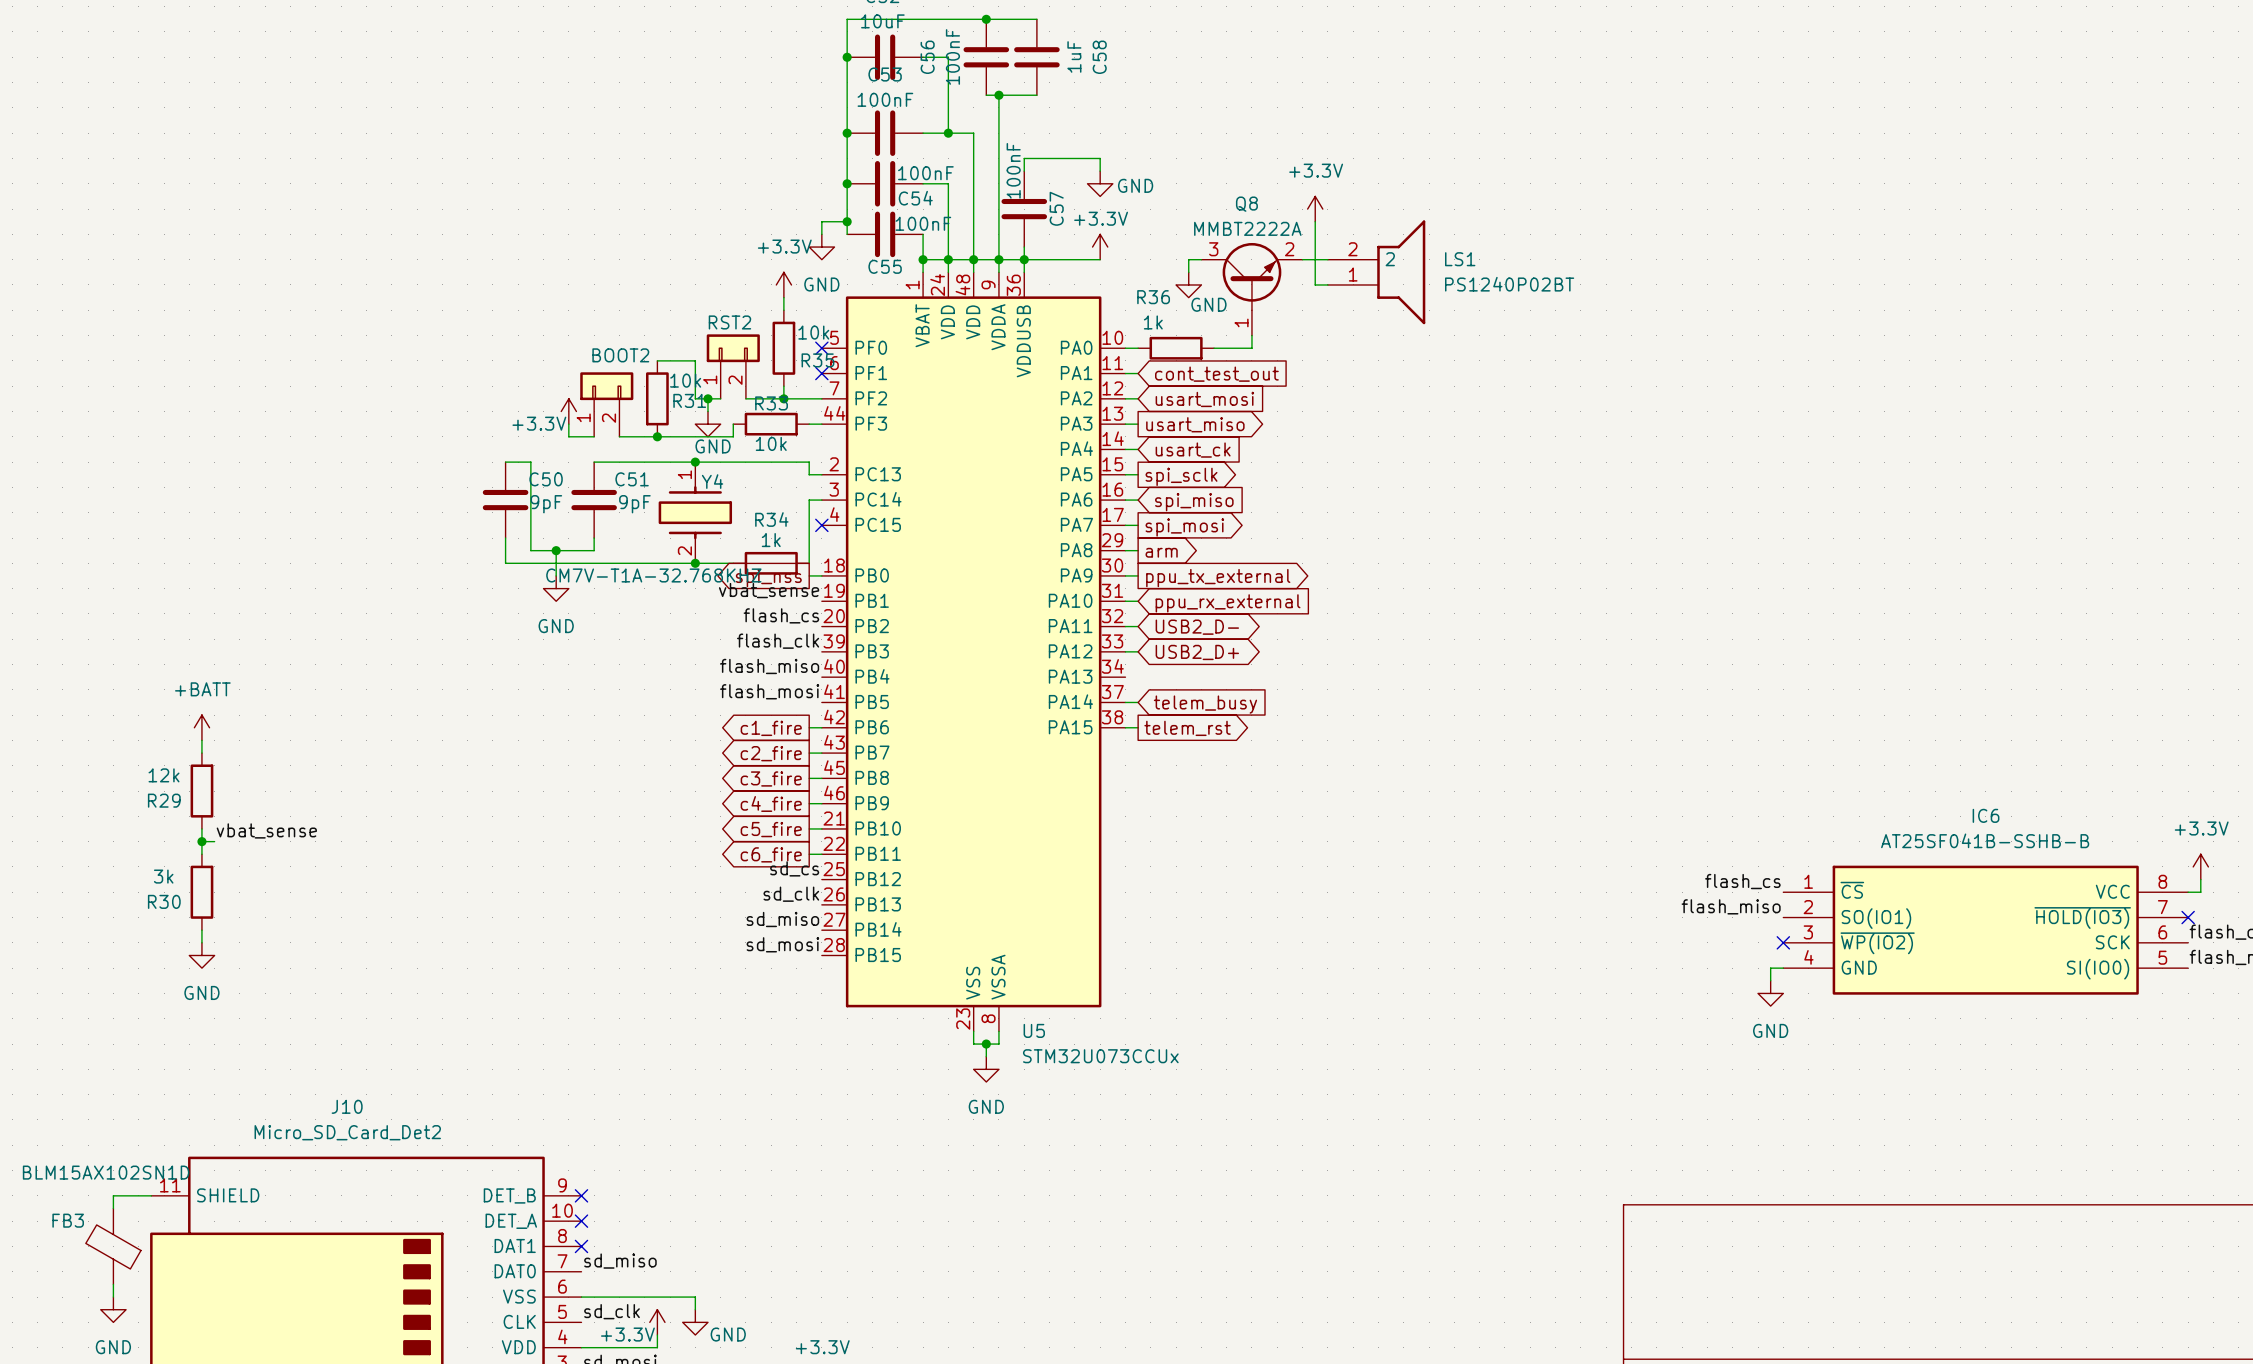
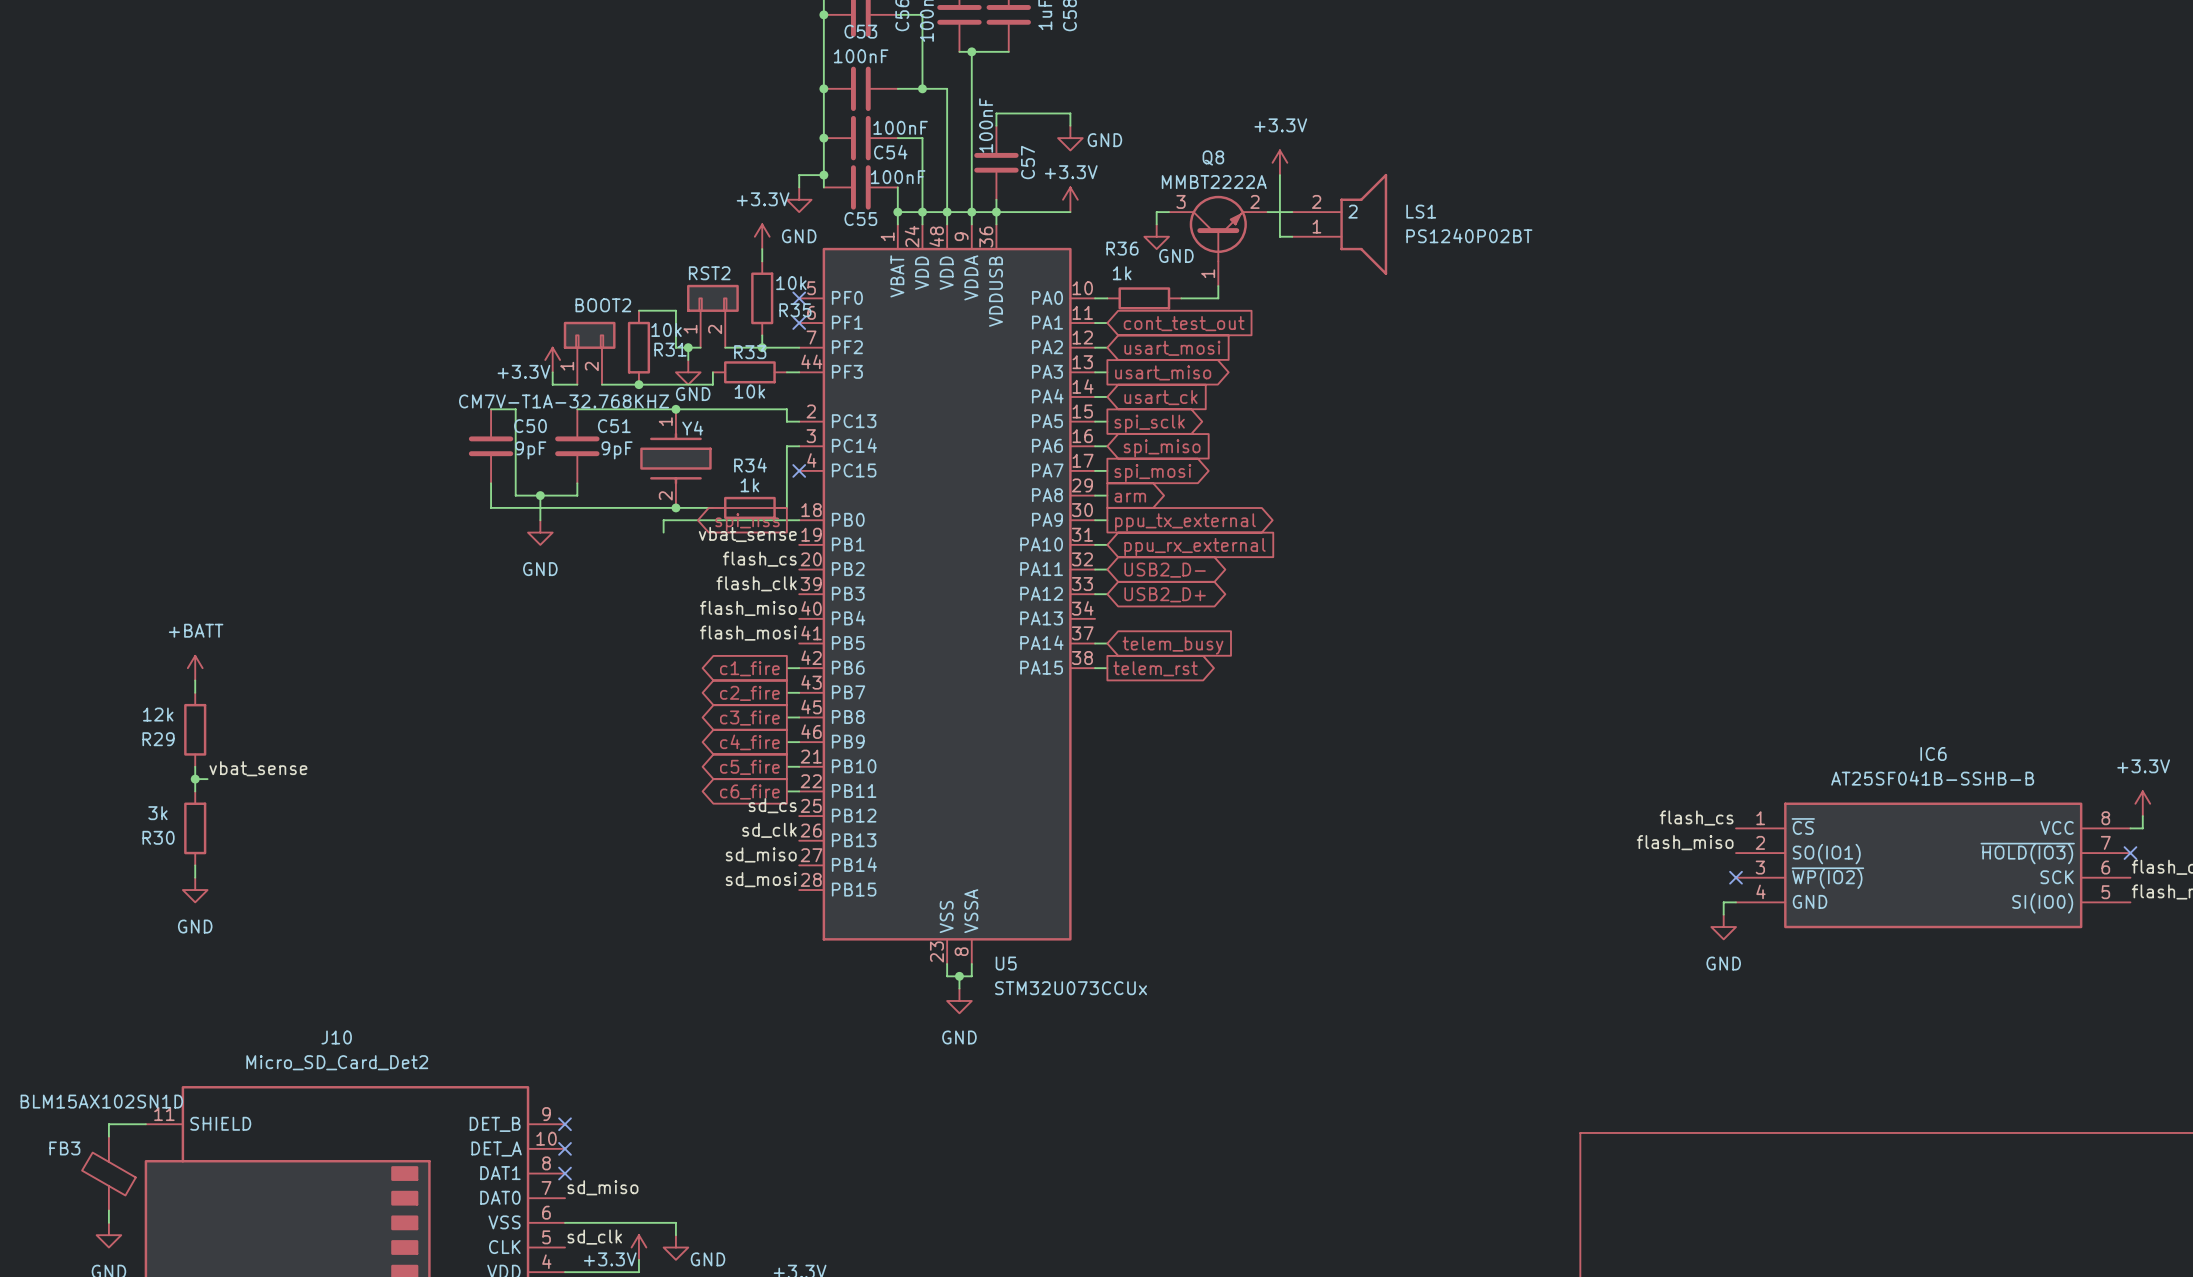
Y4 value position: CM7V-T1A-32.768KHZ (653, 575) -> CM7V-T1A-32.768KHZ (564, 401)
wire: none -> (786, 520) (663, 520) (663, 532)

